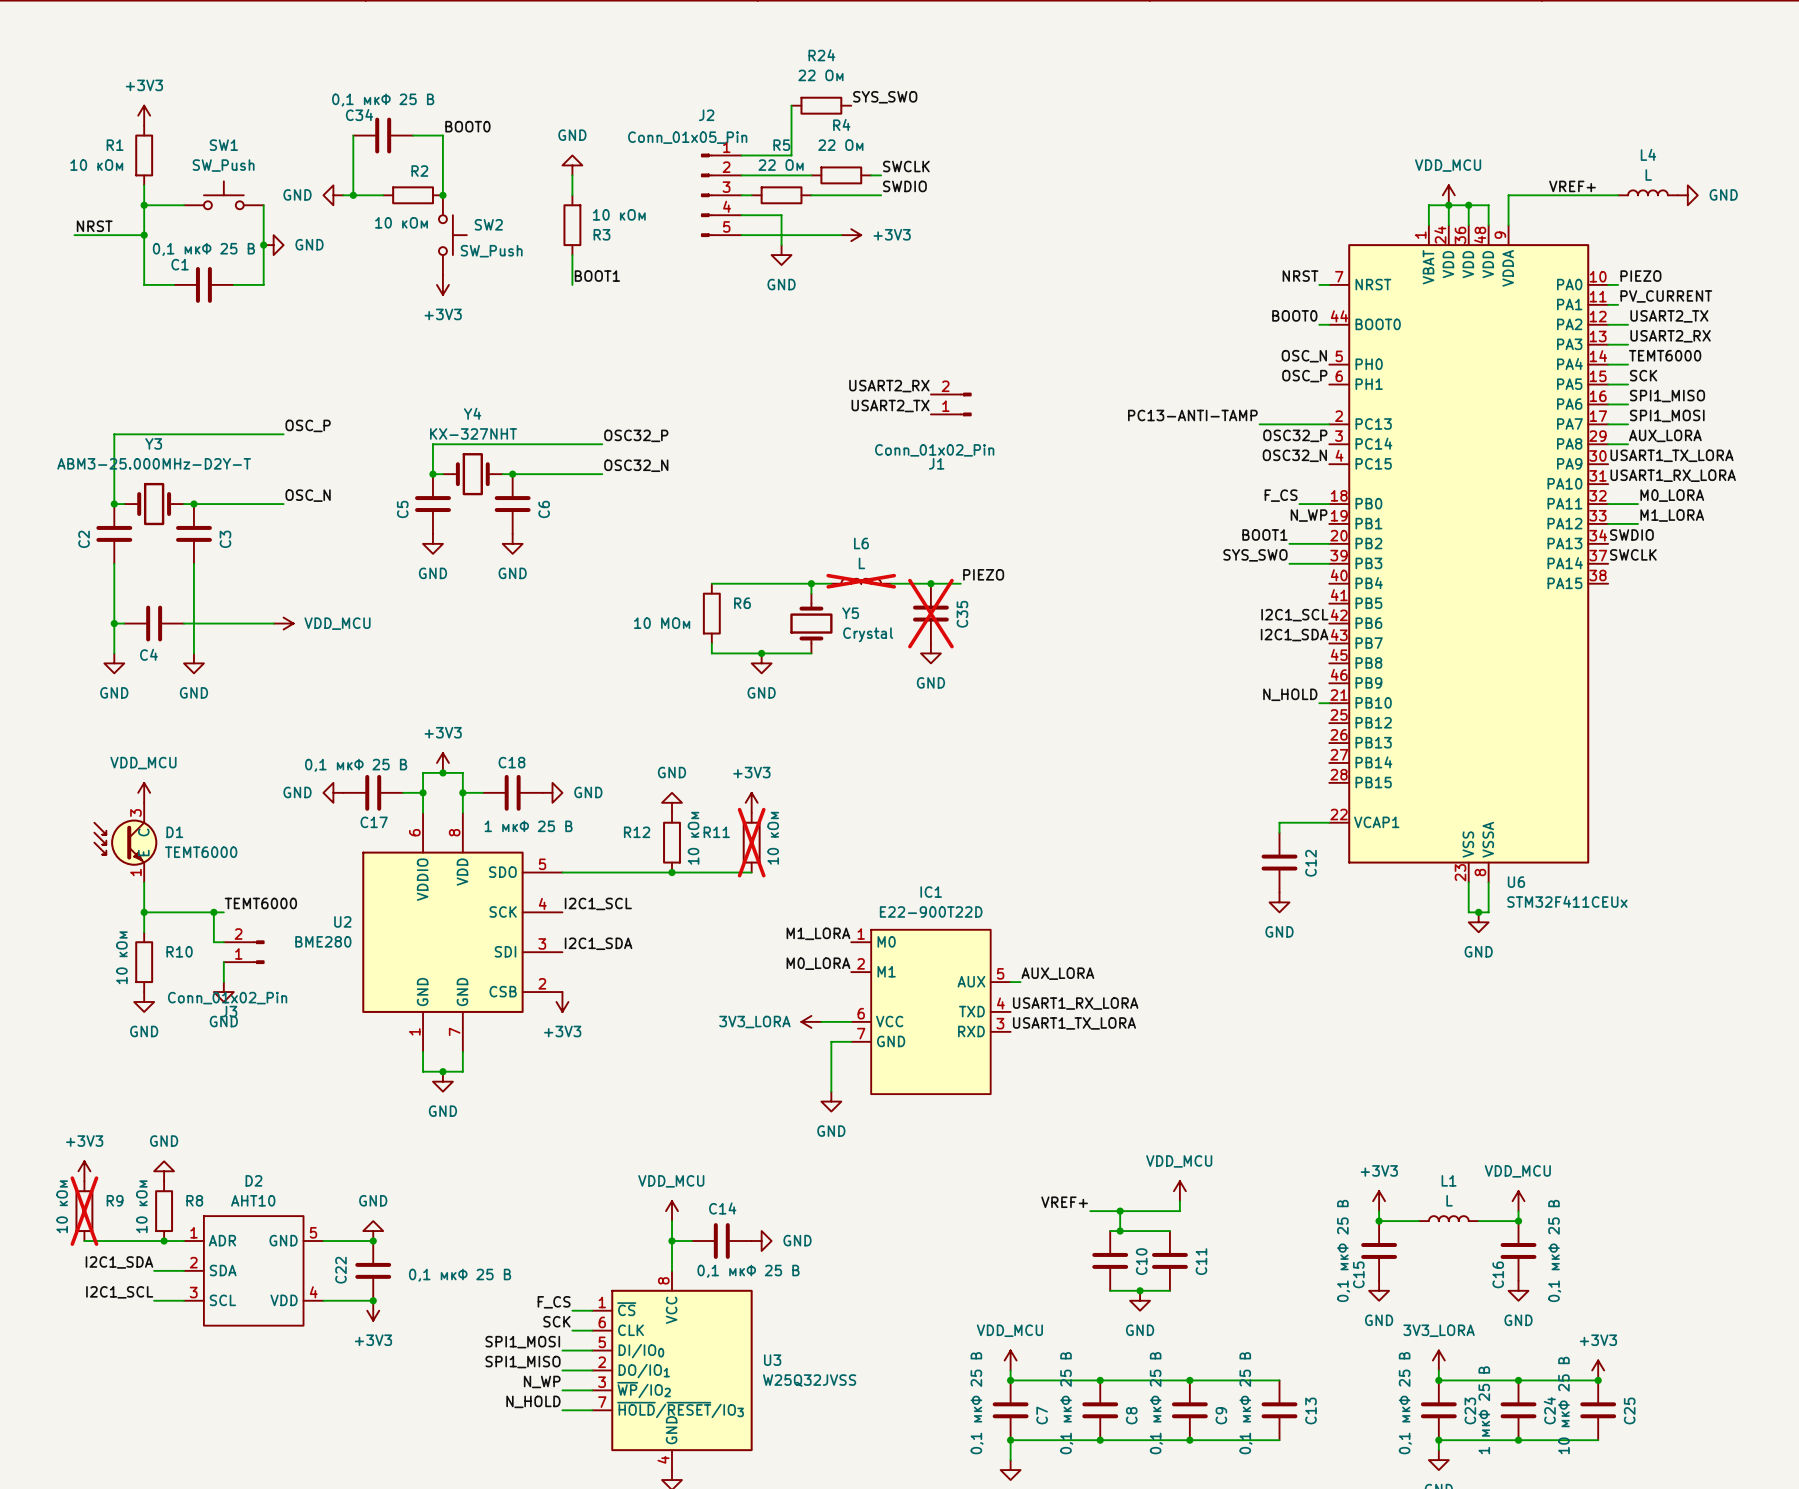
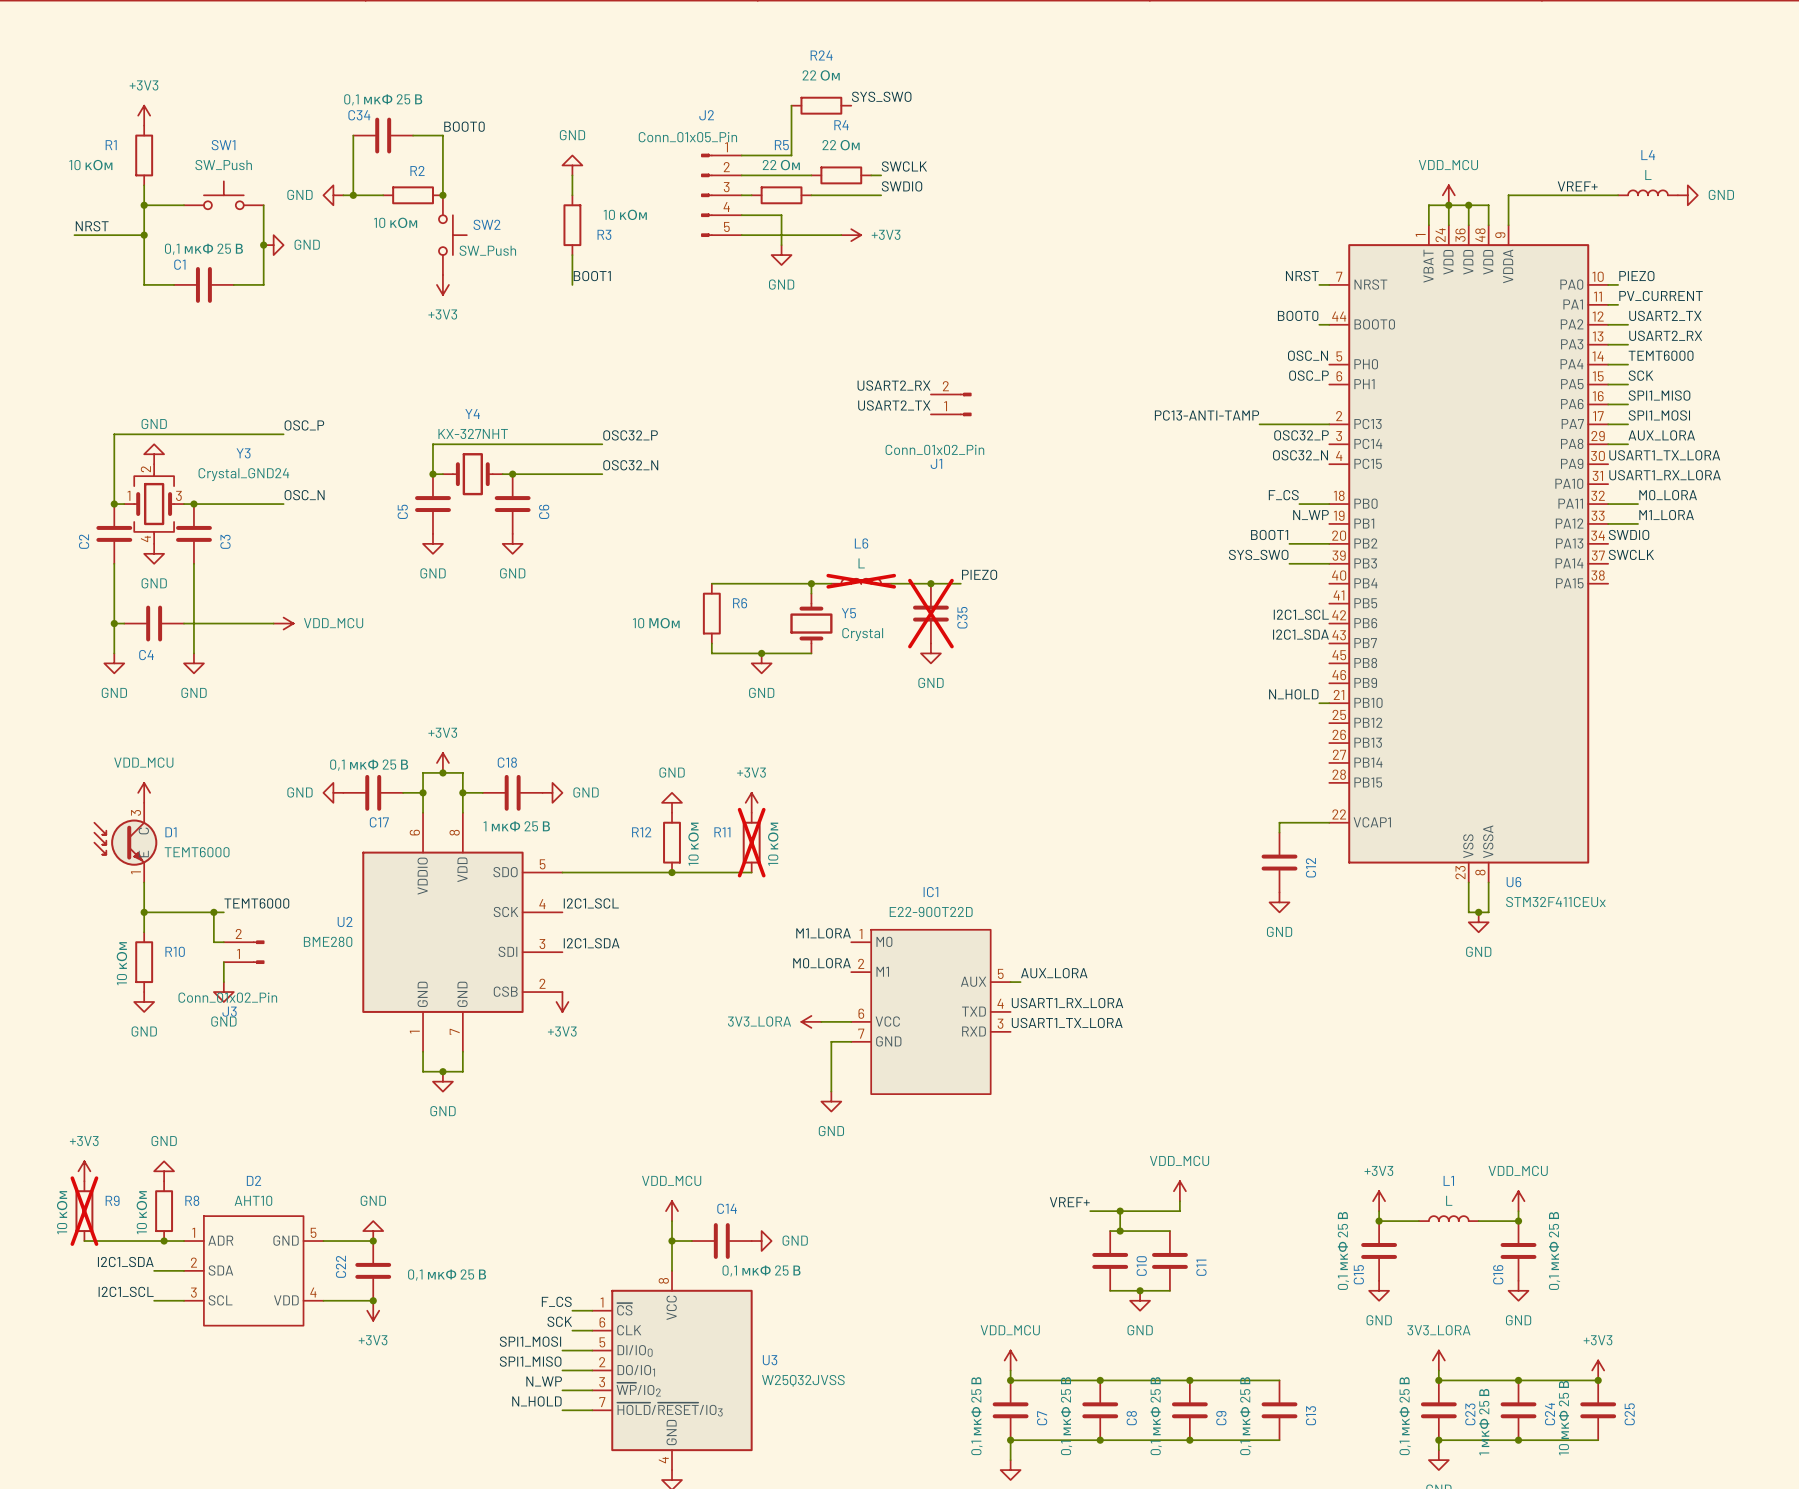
Y3 name position: Y3 (153, 443) -> Y3 (243, 453)
power symbol: none -> GND (154, 454)
Y3 value: ABM3-25.000MHz-D2Y-T (154, 463) -> Crystal_GND24 (243, 474)
Y3 symbol: [124, 482, 185, 526] -> [124, 464, 185, 544]
power symbol: none -> GND (154, 553)

